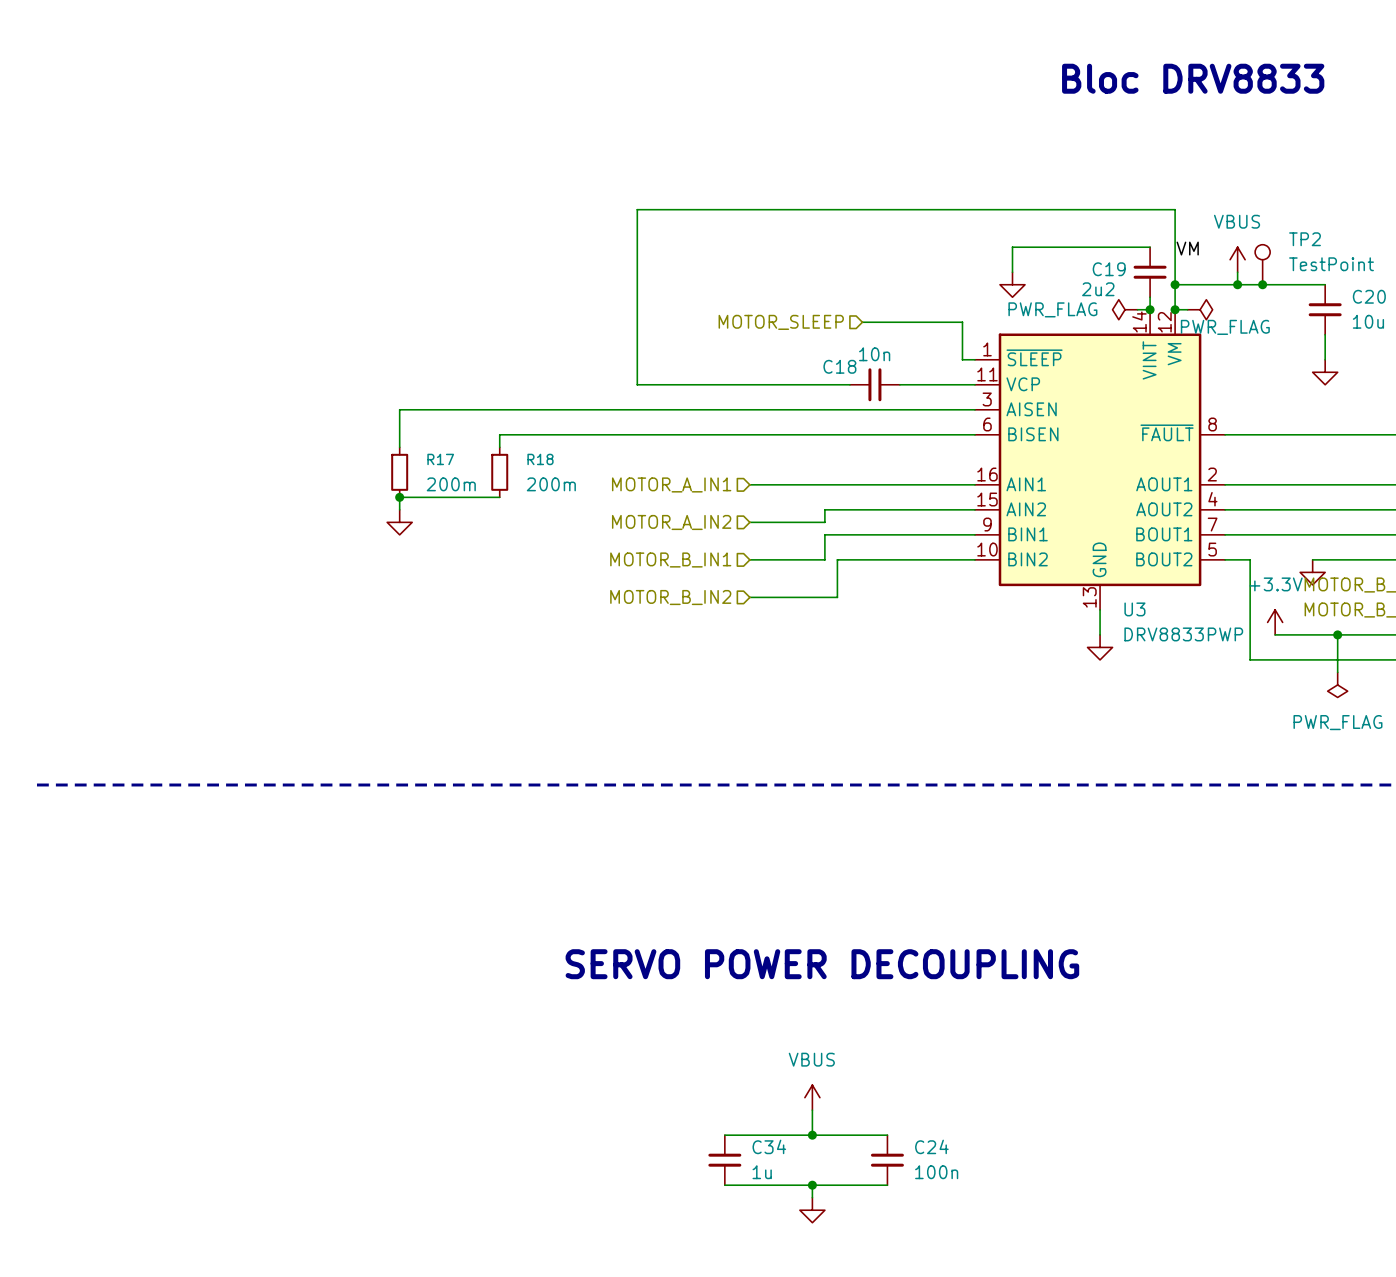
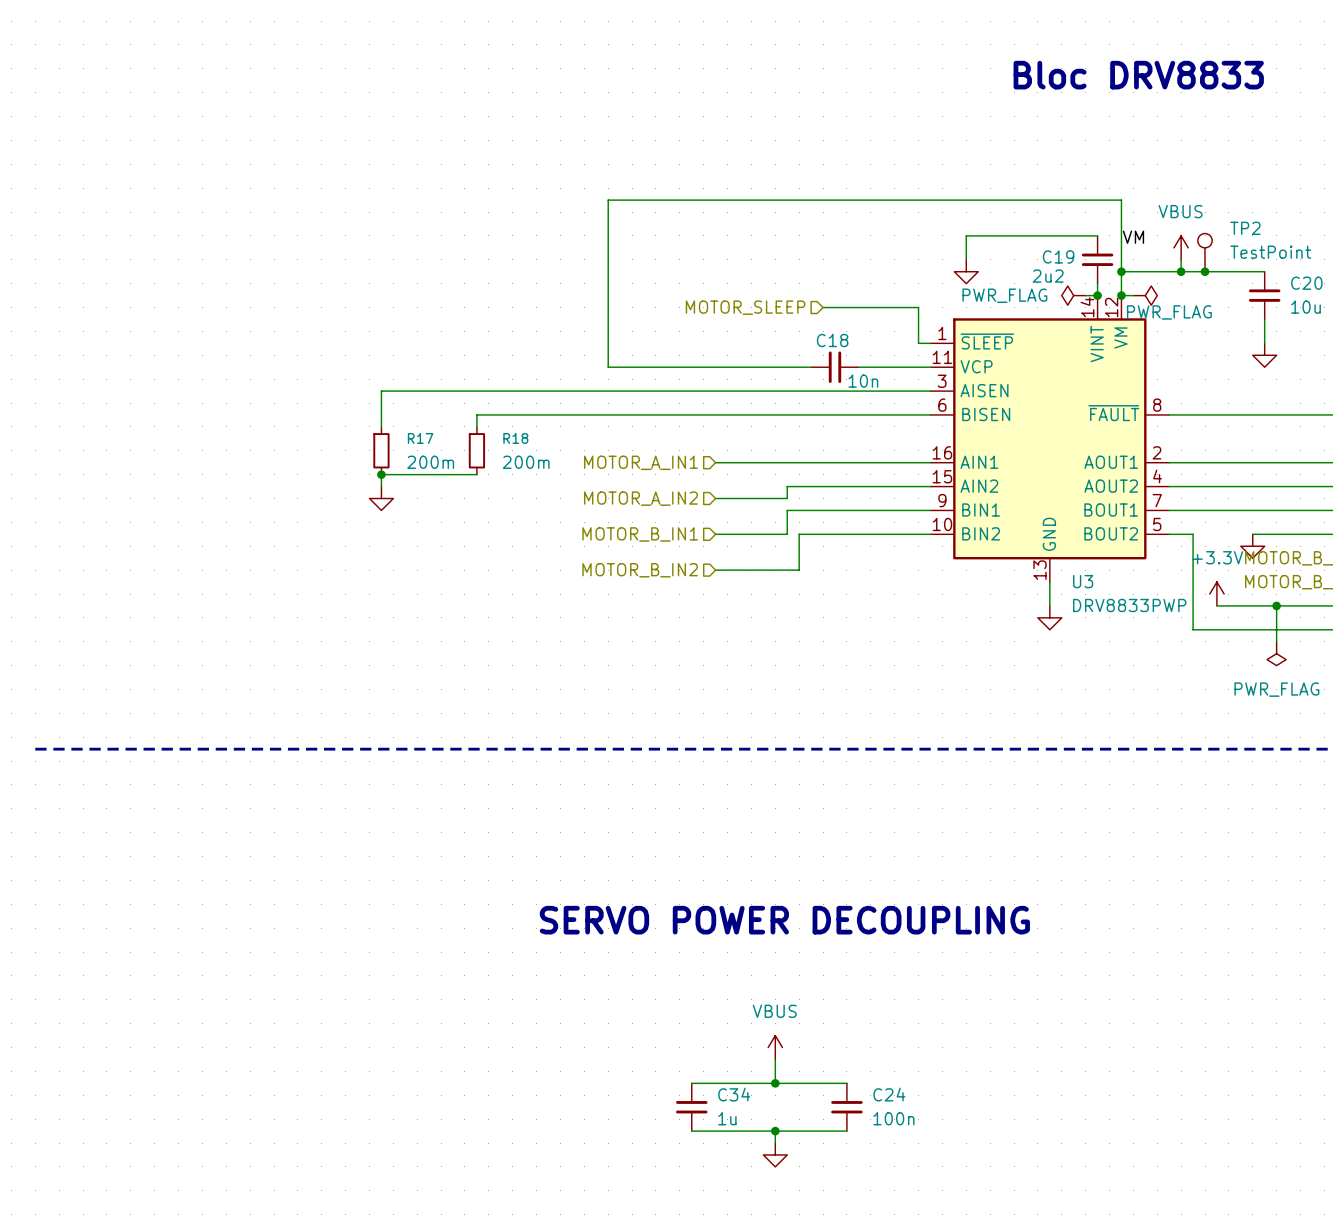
C18 value position: 10n (874, 354) -> 10n (863, 381)
C18 name position: C18 (839, 366) -> C18 (832, 340)

